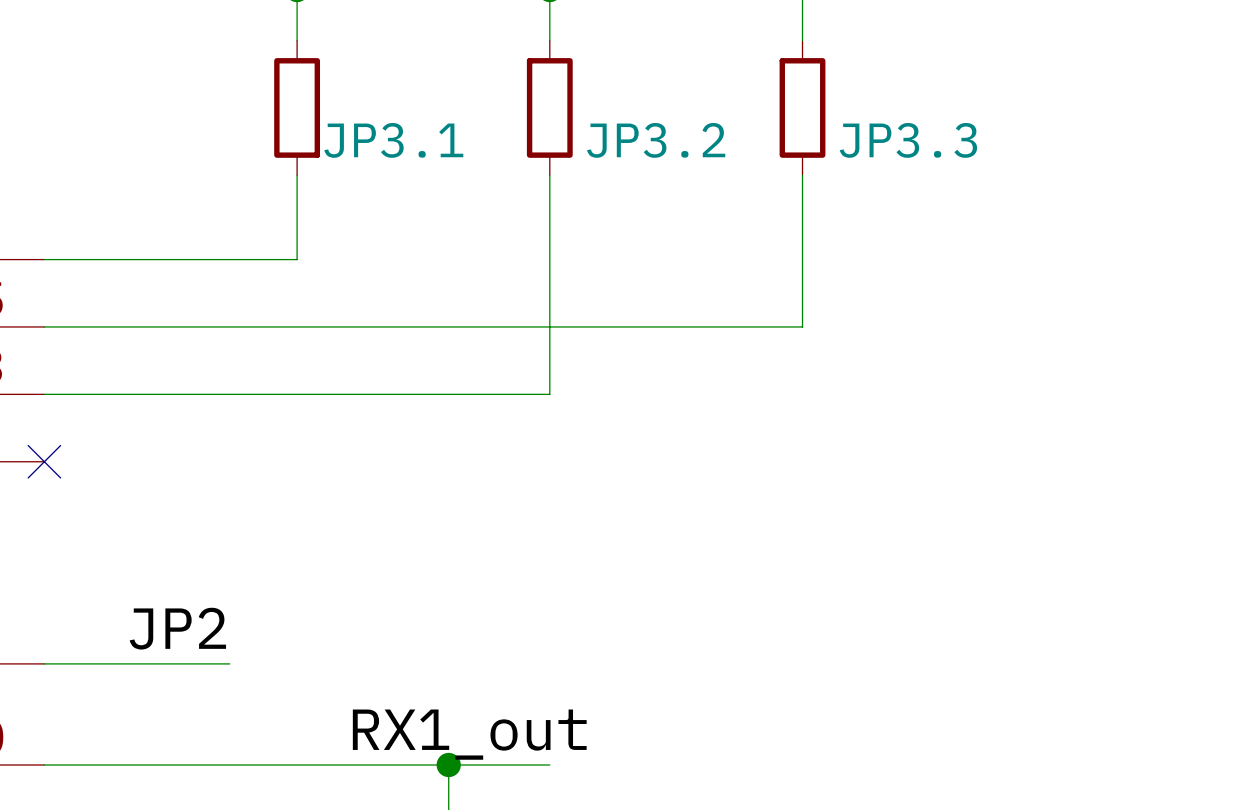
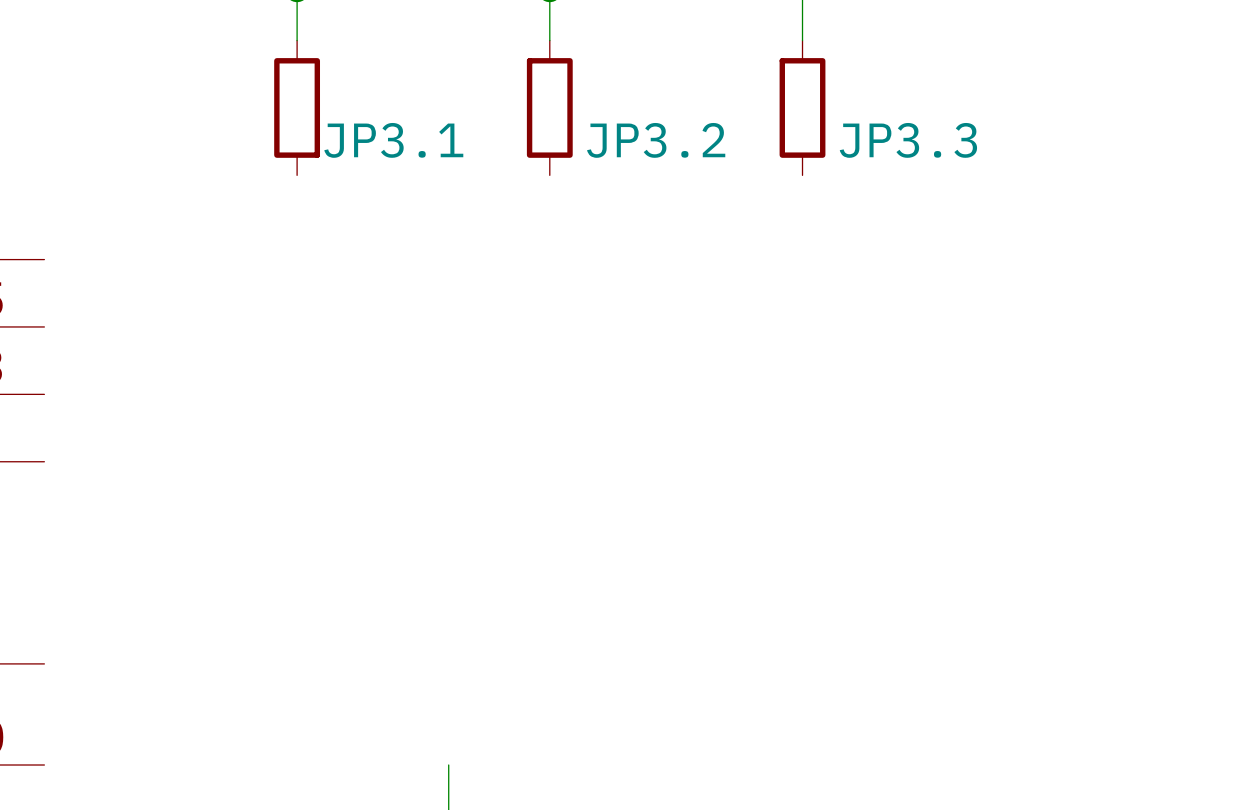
wire: (297, 175) (297, 259) (44, 259) -> none
wire: (549, 175) (549, 394) (44, 394) -> none
wire: (802, 175) (802, 326) (44, 326) -> none
no-connect mark: (44, 461) -> none
label: JP2 (177, 628) -> none
wire: (44, 663) (229, 663) -> none
label: RX1_out (469, 734) -> none
wire: (44, 765) (549, 765) -> none
junction: (448, 765) -> none

